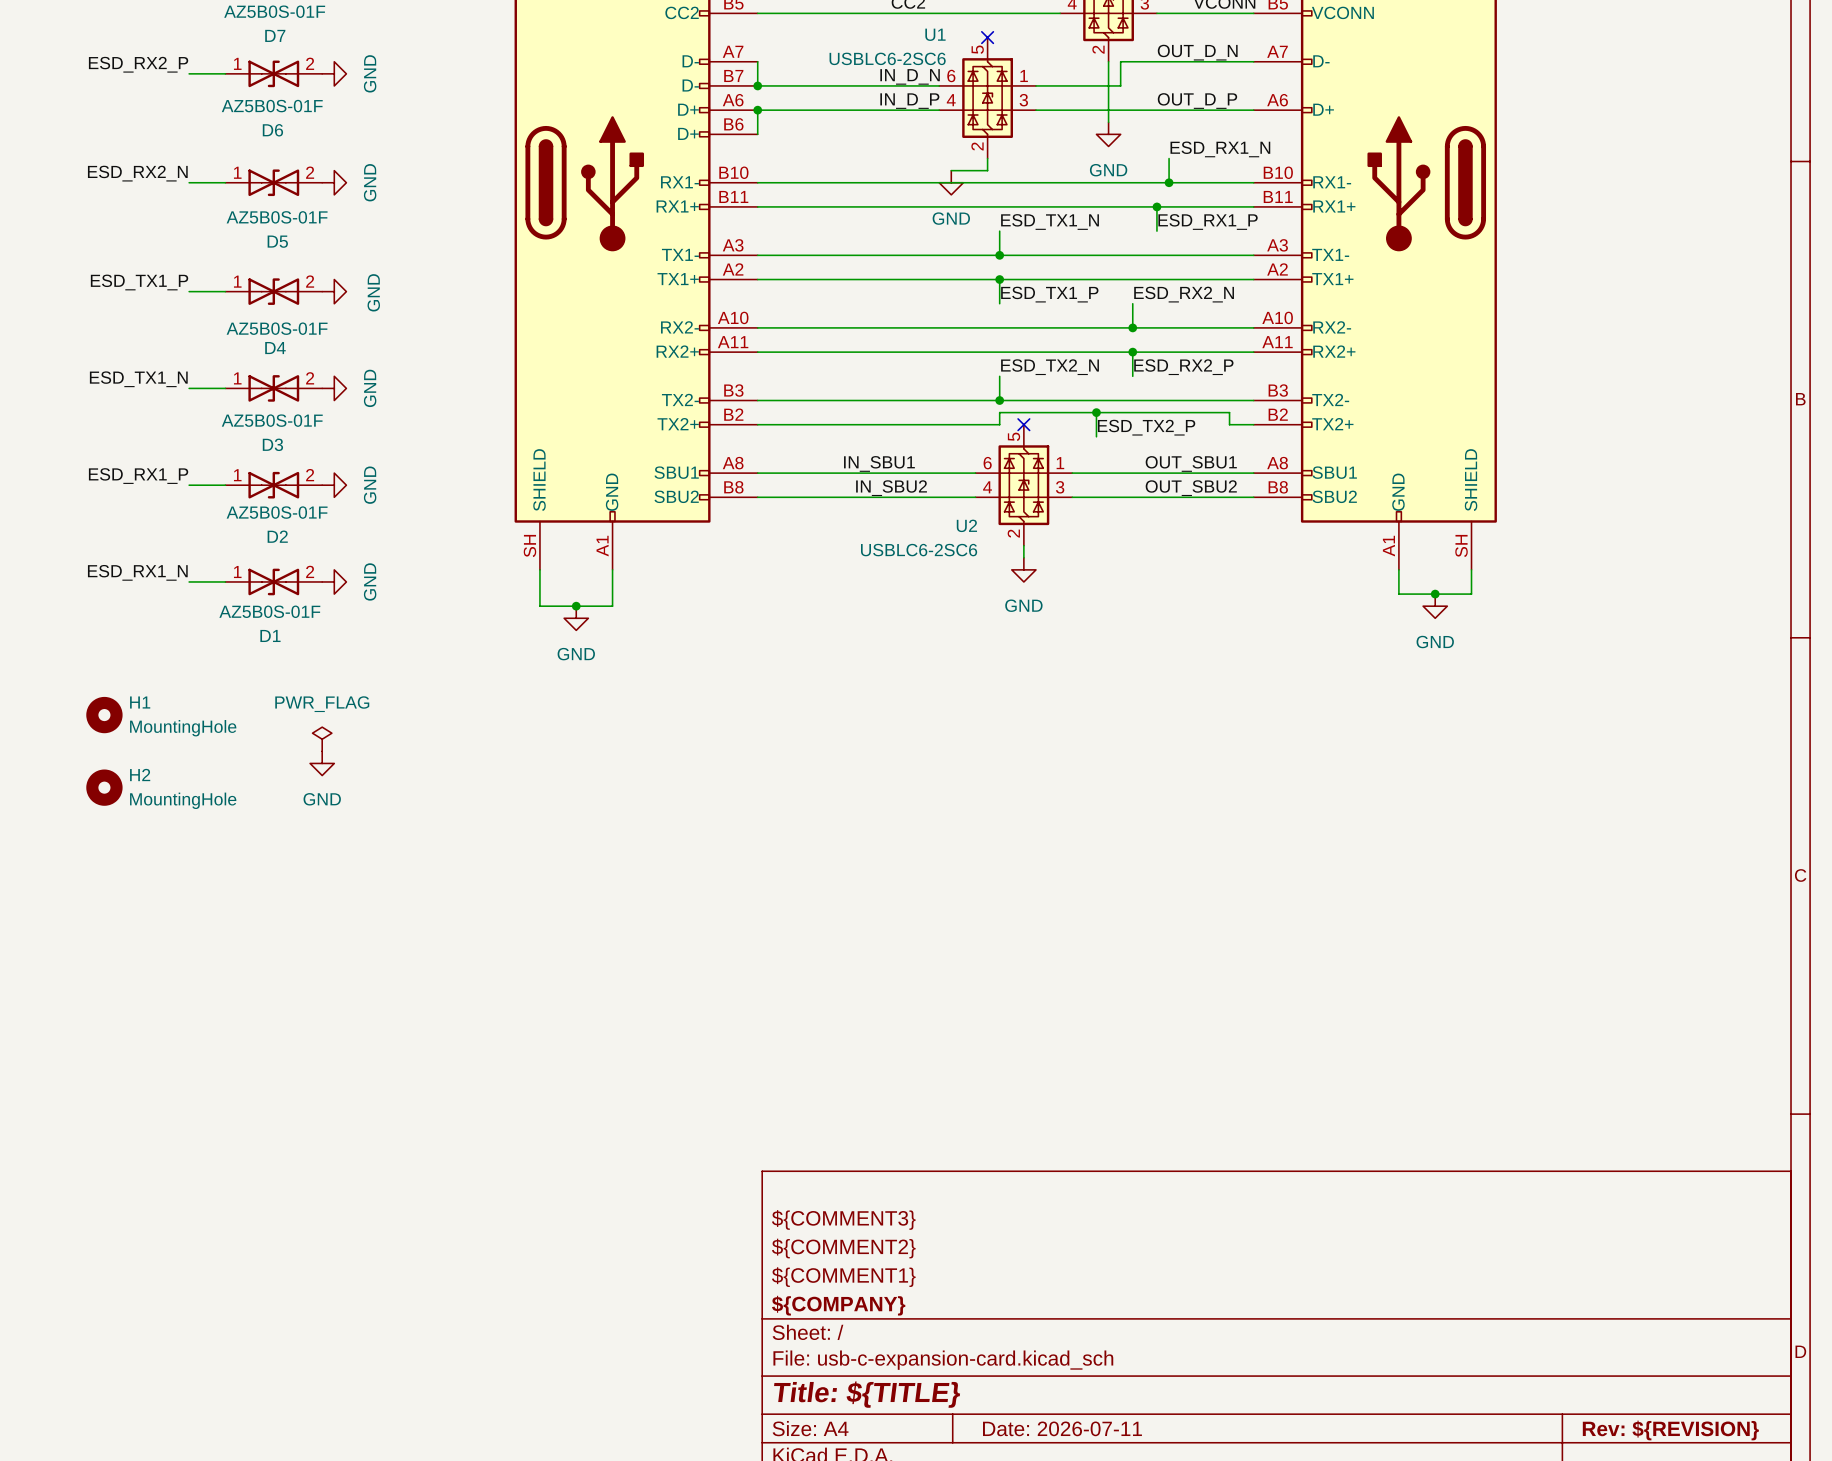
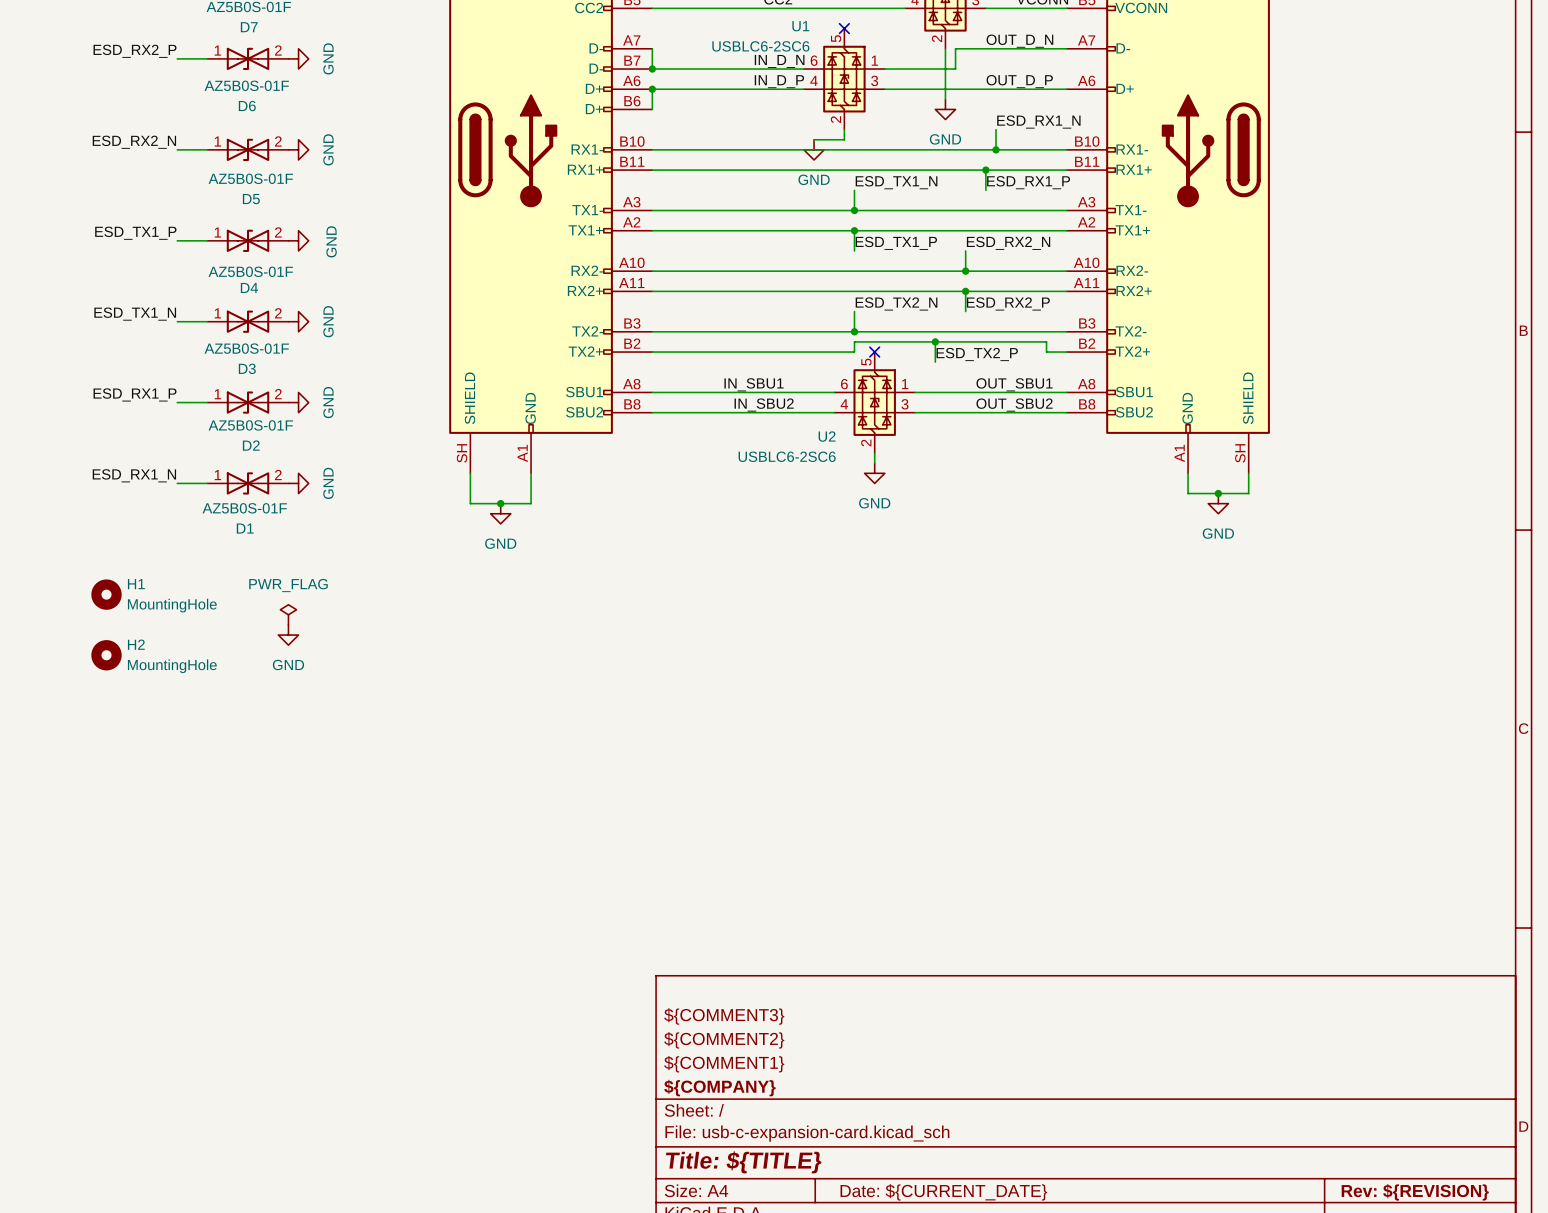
title block: Date: 2026-07-11 (1062, 1428) -> Date: ${CURRENT_DATE} (943, 1192)

